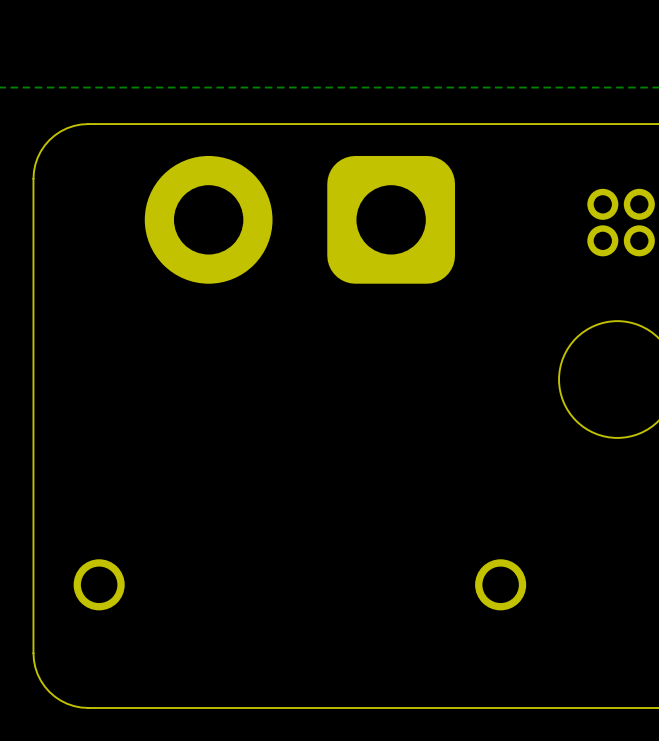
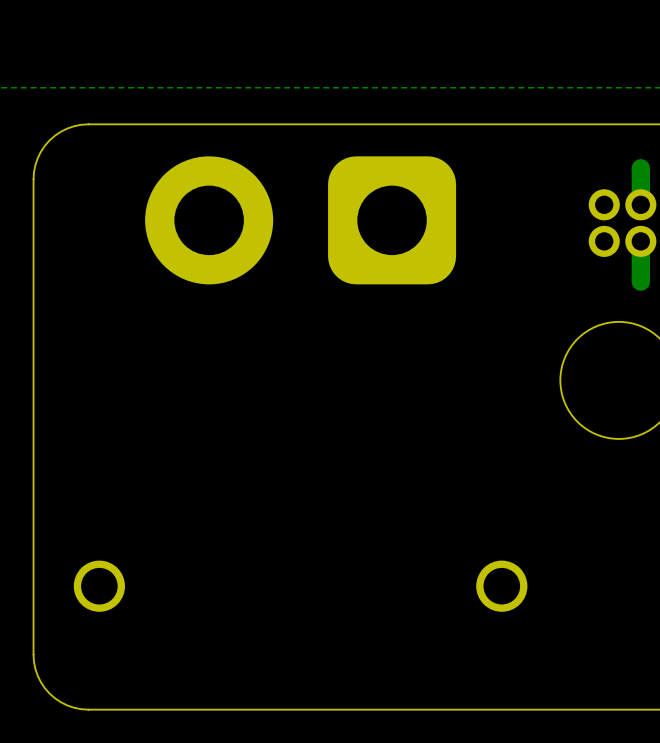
track: none -> (640, 168) (640, 204)
track: none -> (640, 241) (640, 281)

